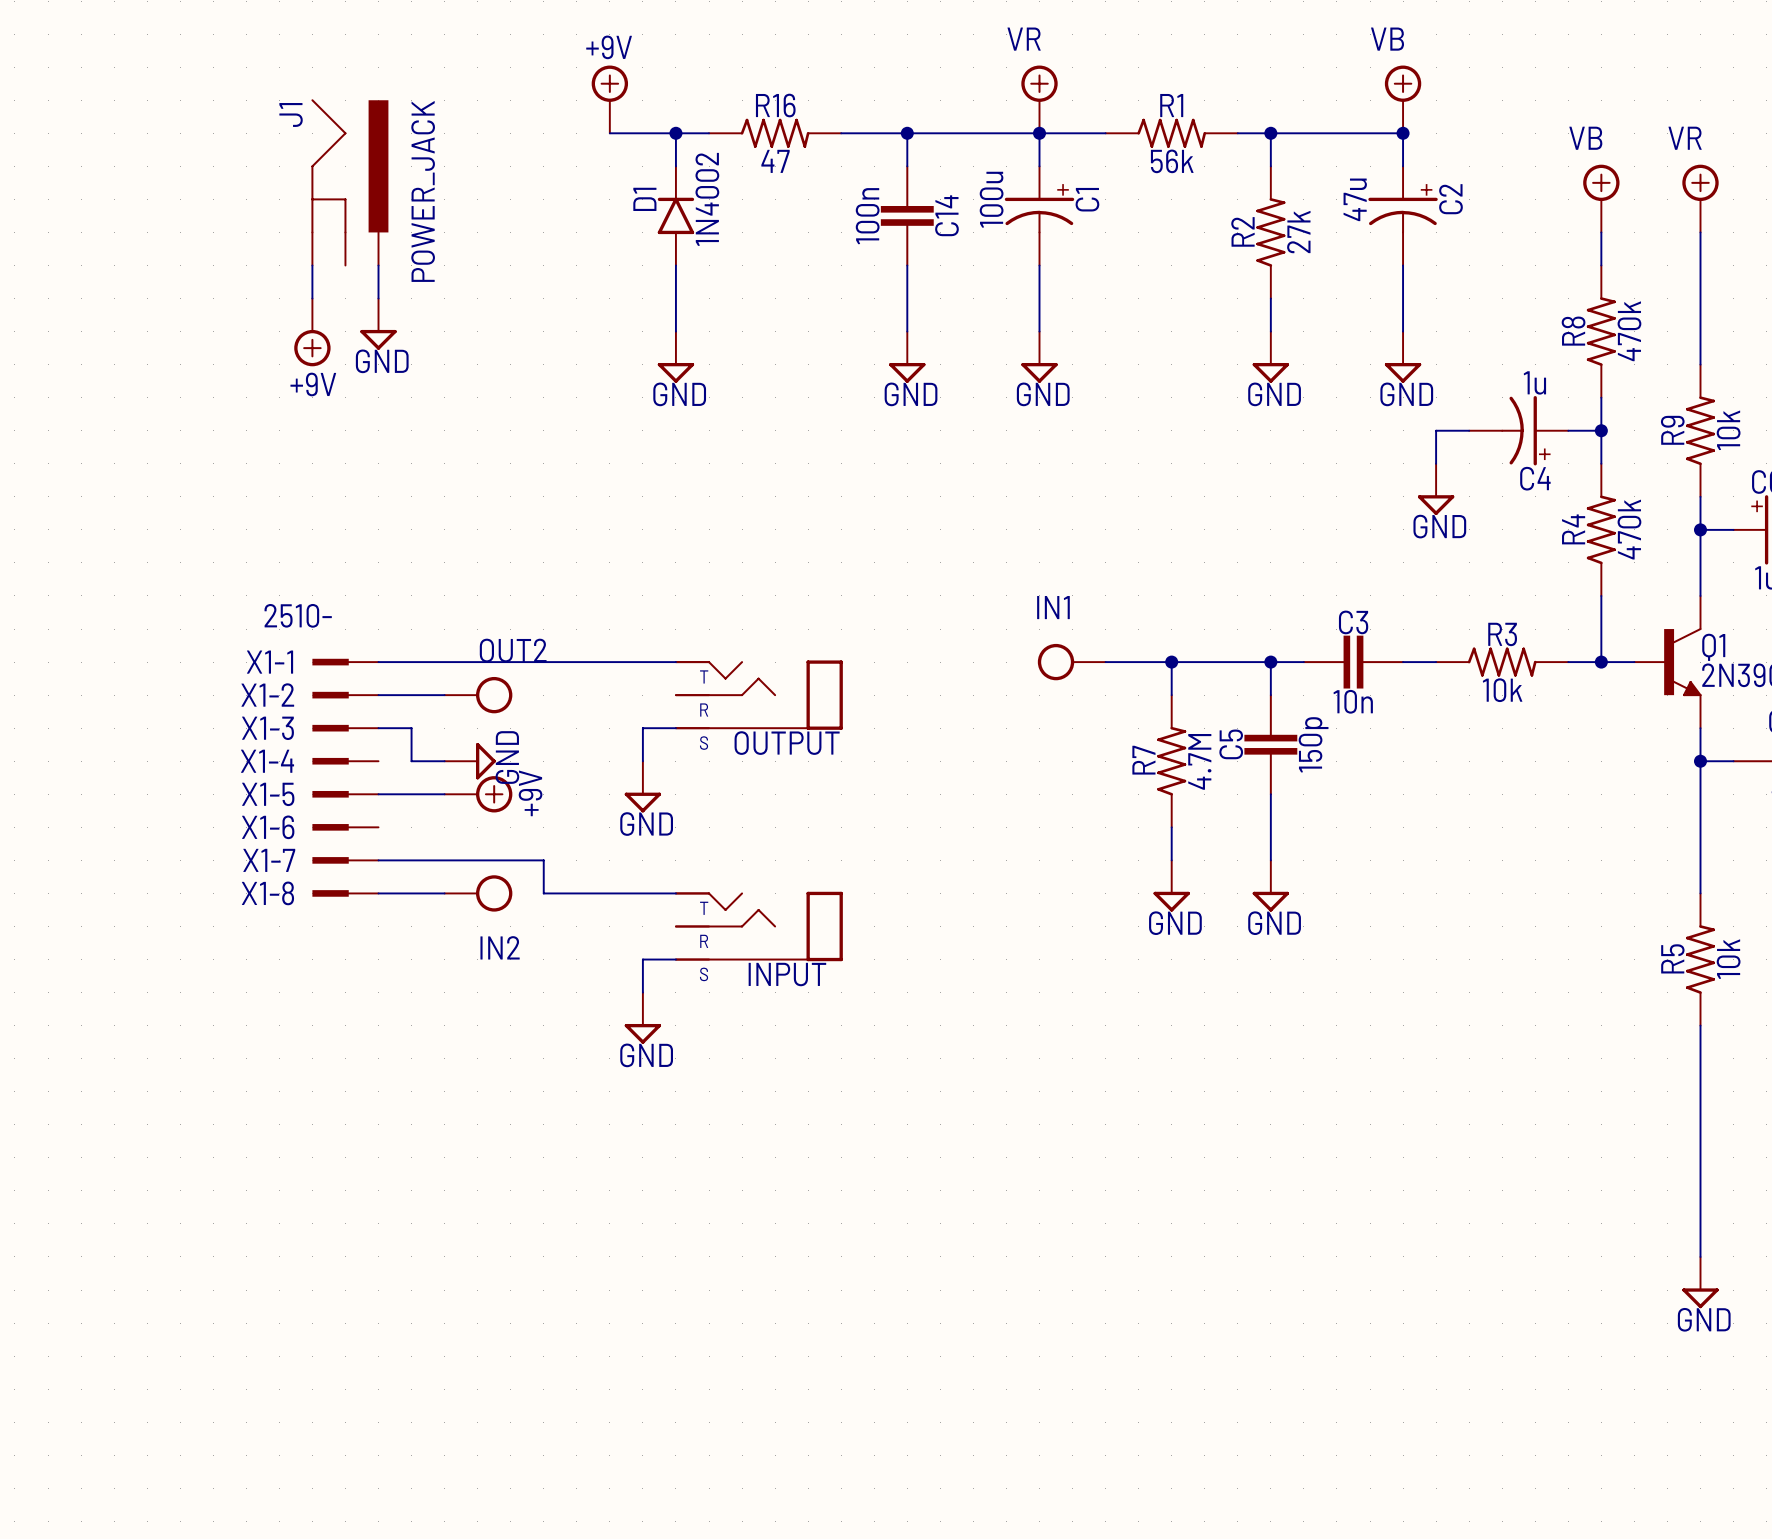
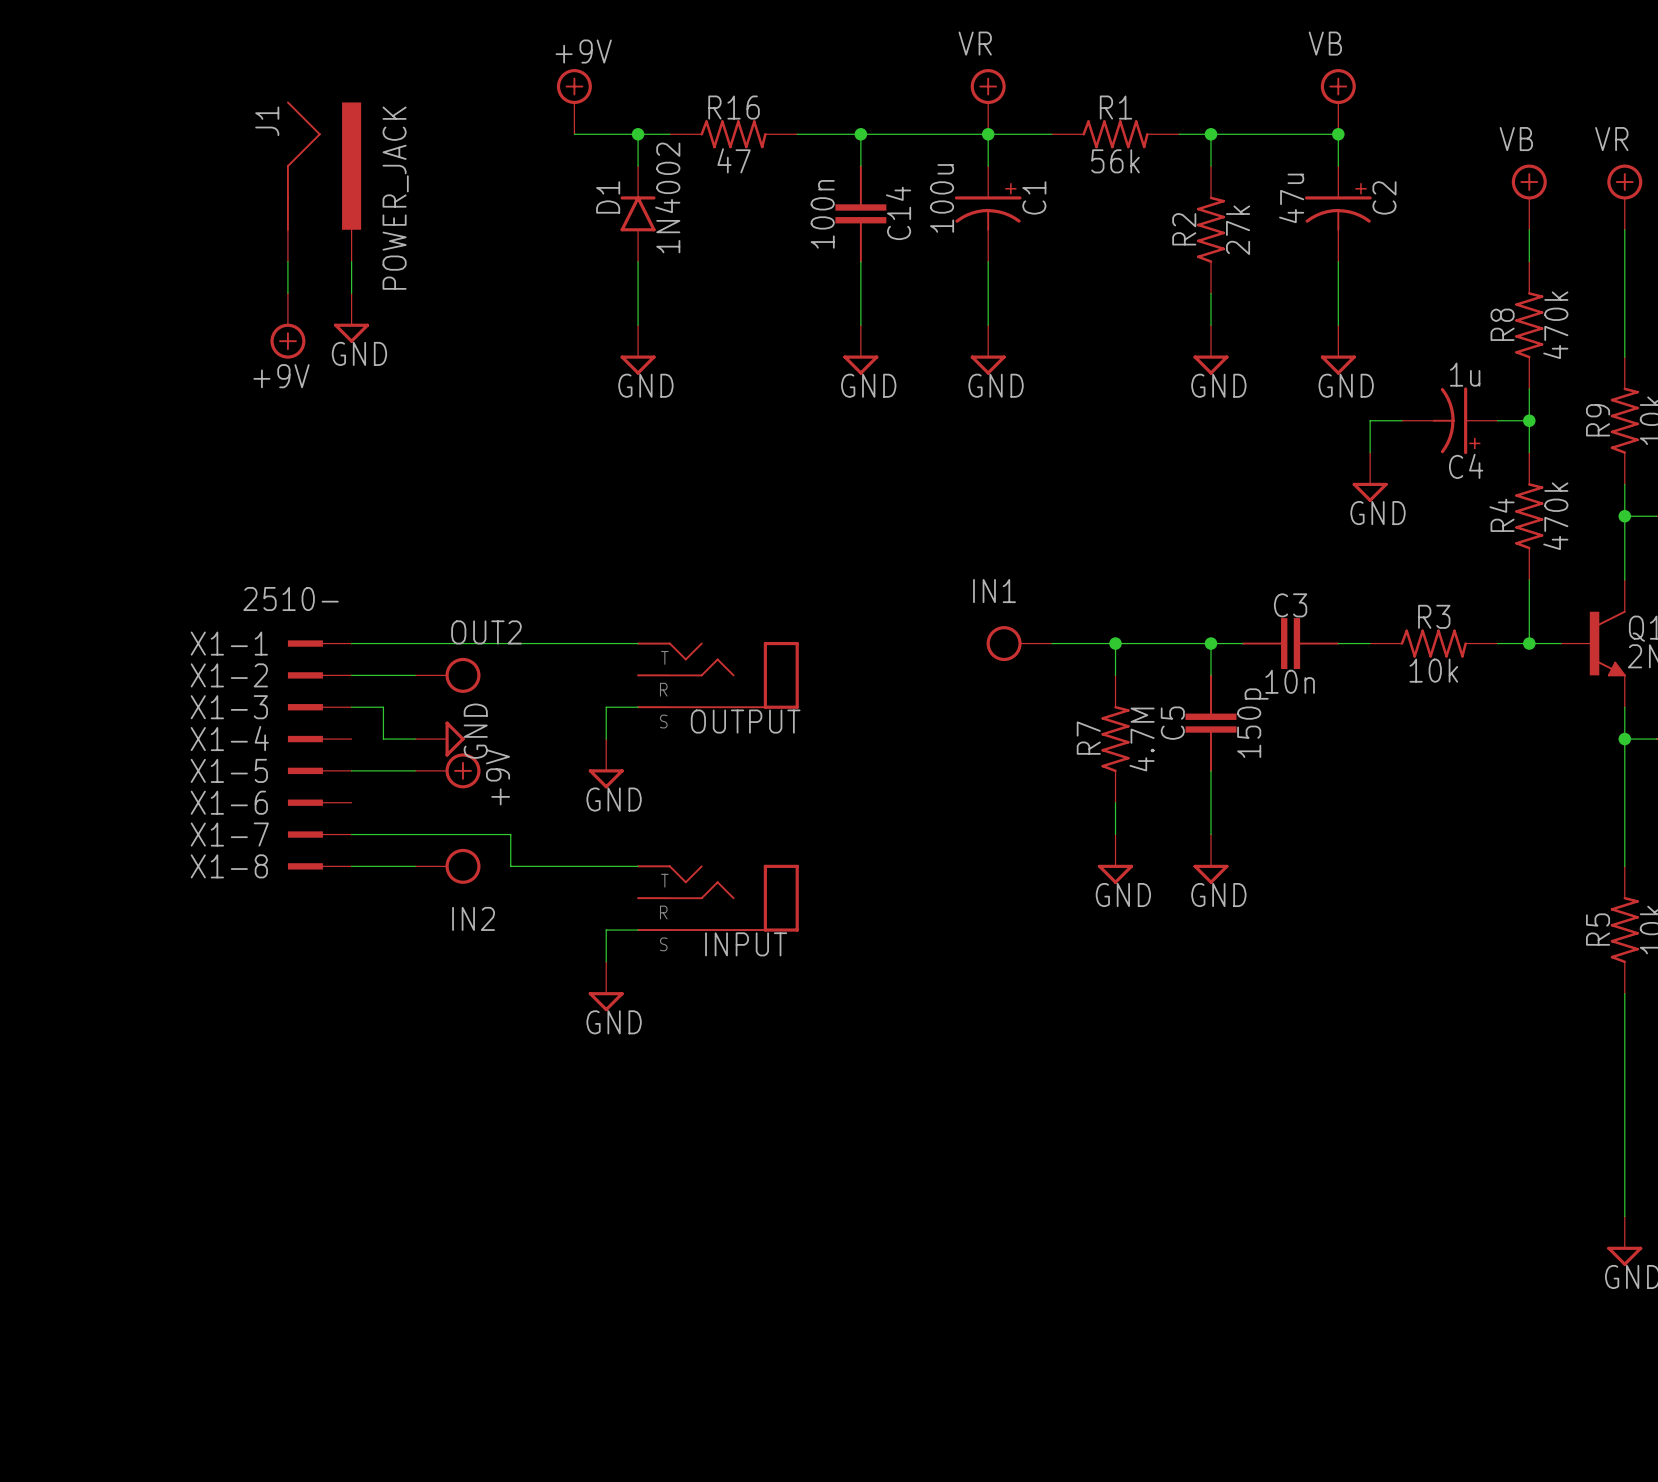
J1 symbol: [311, 99, 389, 266] -> [286, 101, 362, 262]

